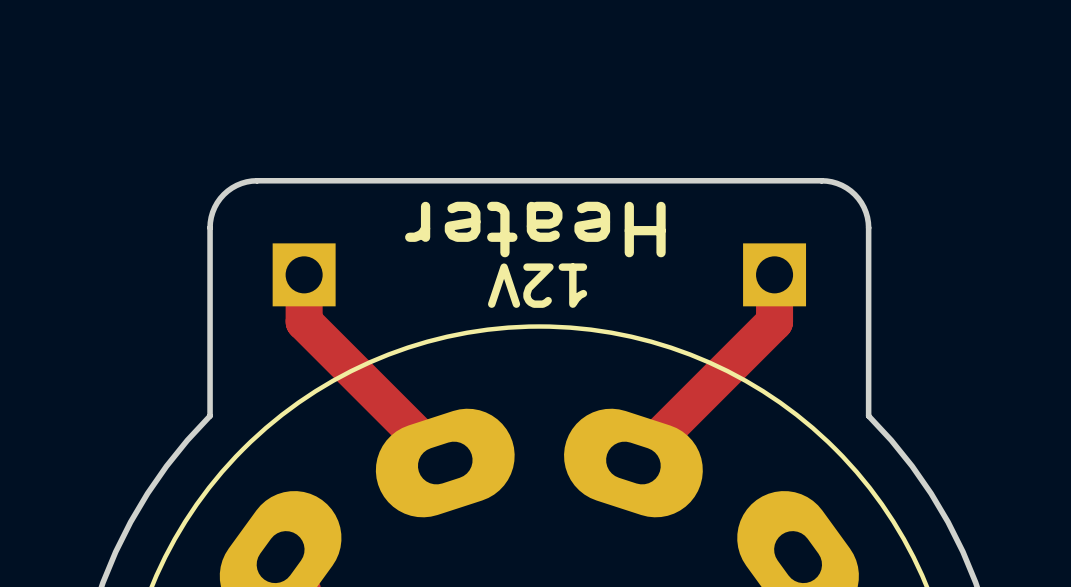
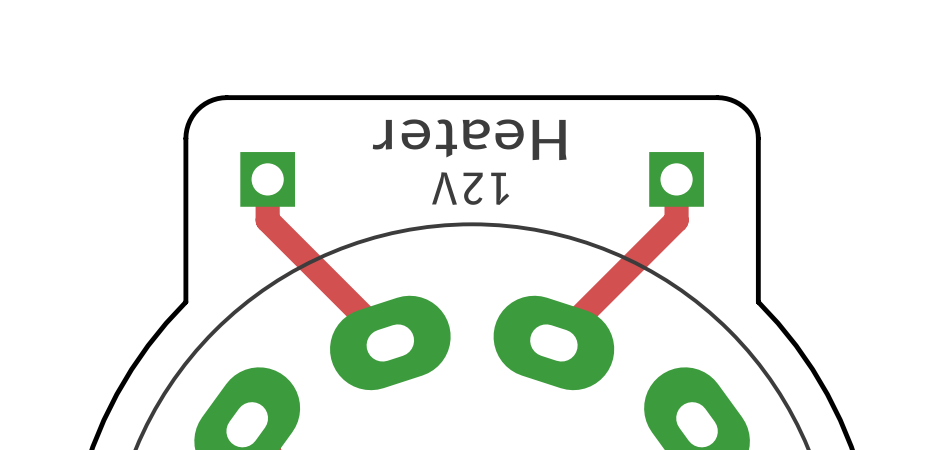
track width: thick (304, 274) (304, 321) (445, 463) -> thin (267, 179) (267, 220) (390, 342)
track width: thick (774, 274) (774, 321) (633, 463) -> thin (676, 179) (676, 220) (553, 342)

